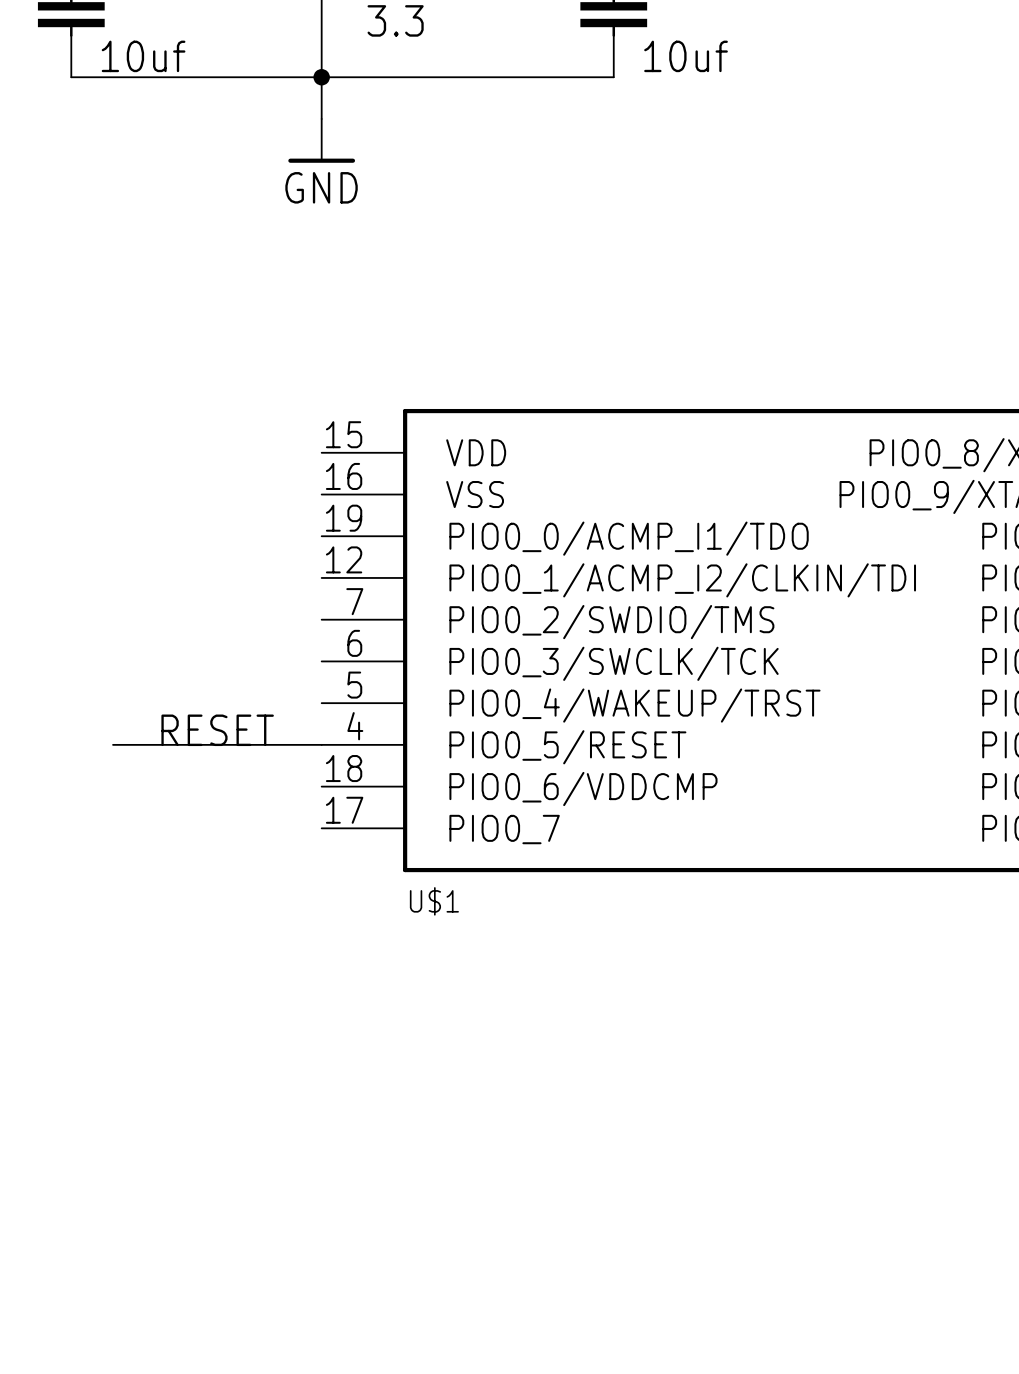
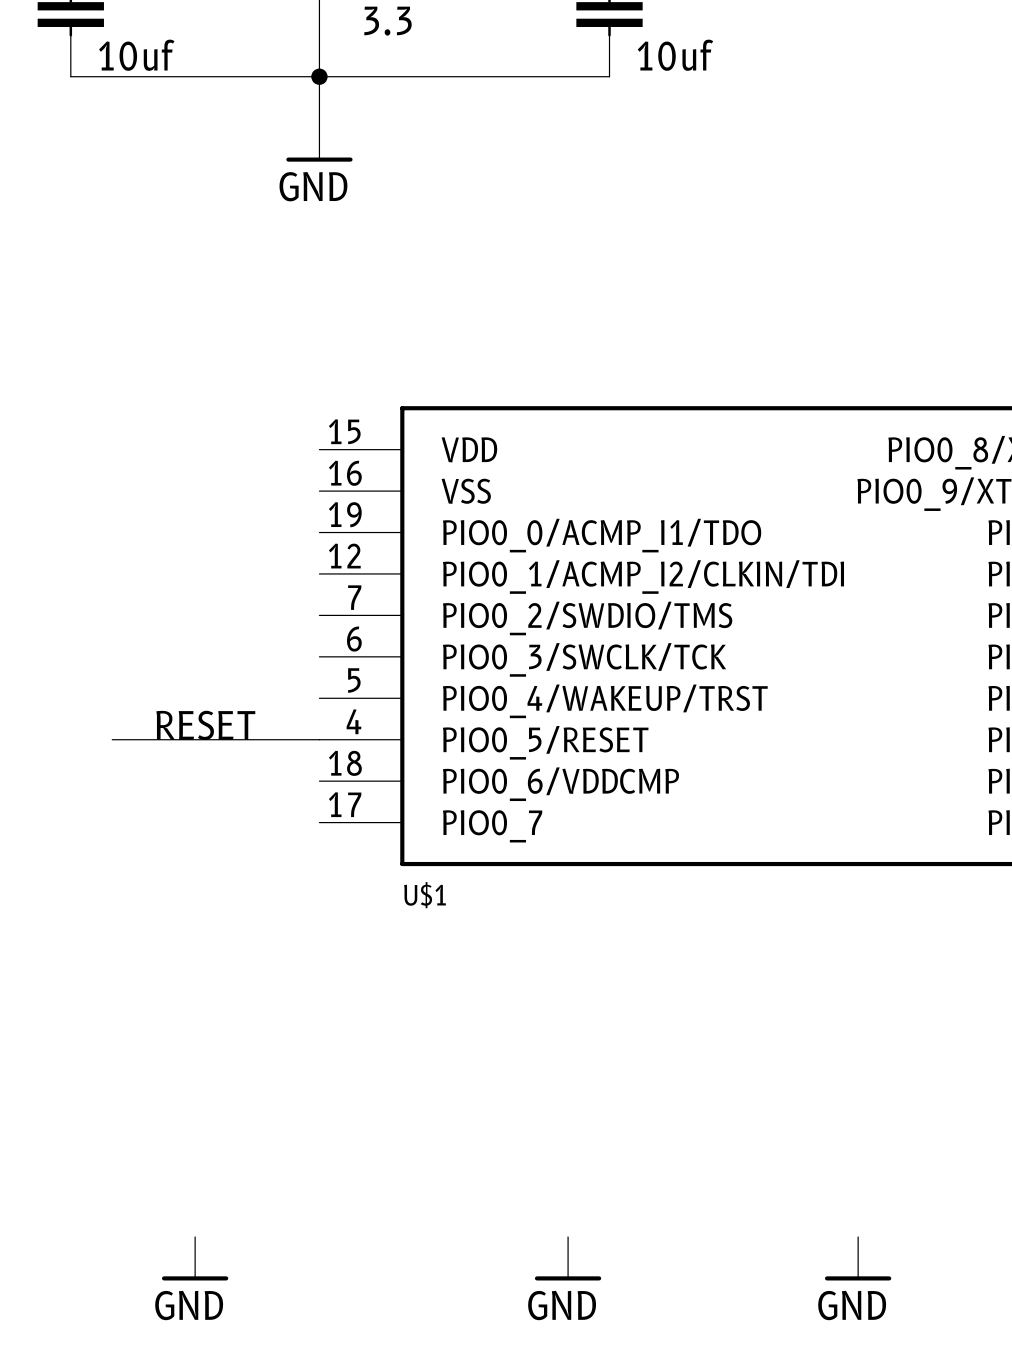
power symbol: none -> GND (195, 1258)
power symbol: none -> GND (568, 1258)
power symbol: none -> GND (858, 1258)

